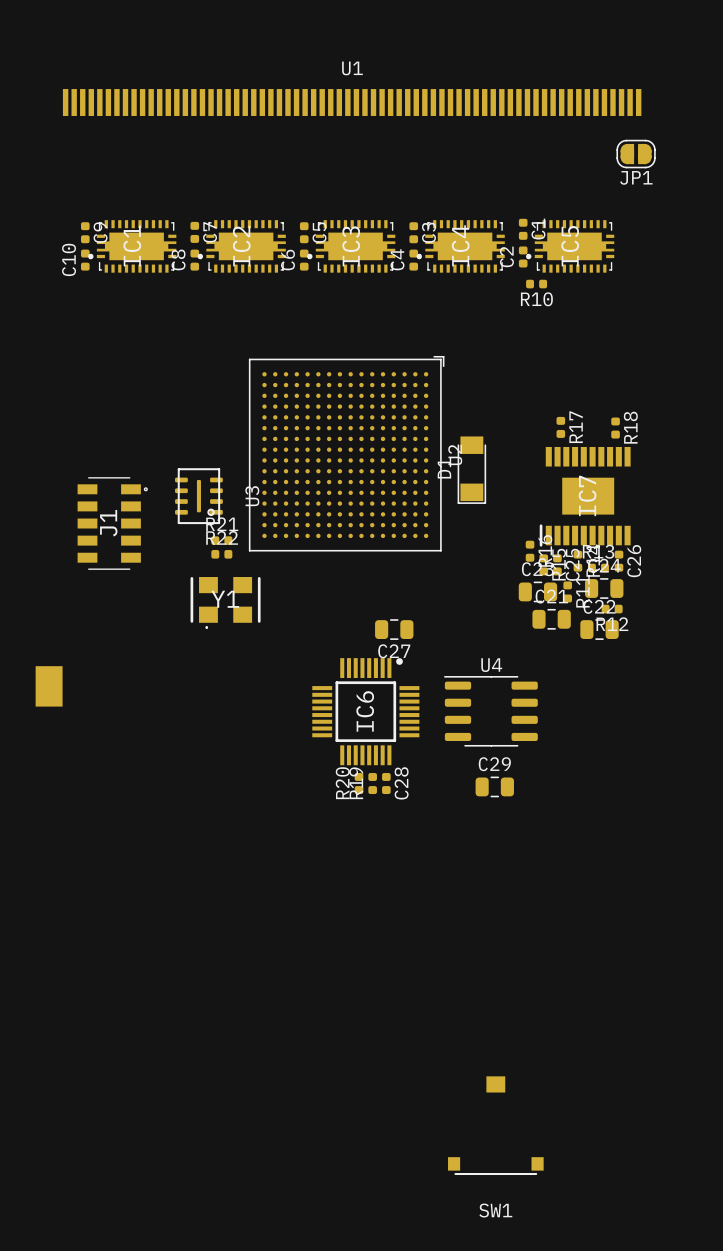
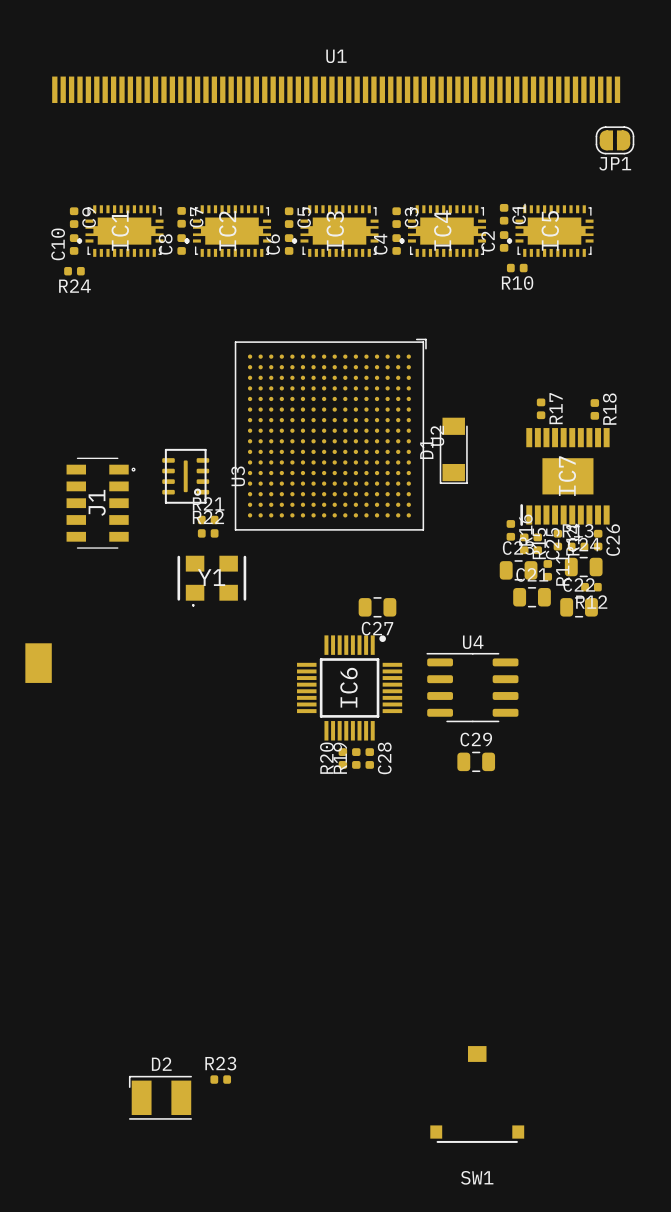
R24: none -> (74, 271)
R23: none -> (220, 1079)
D2: none -> (160, 1097)

